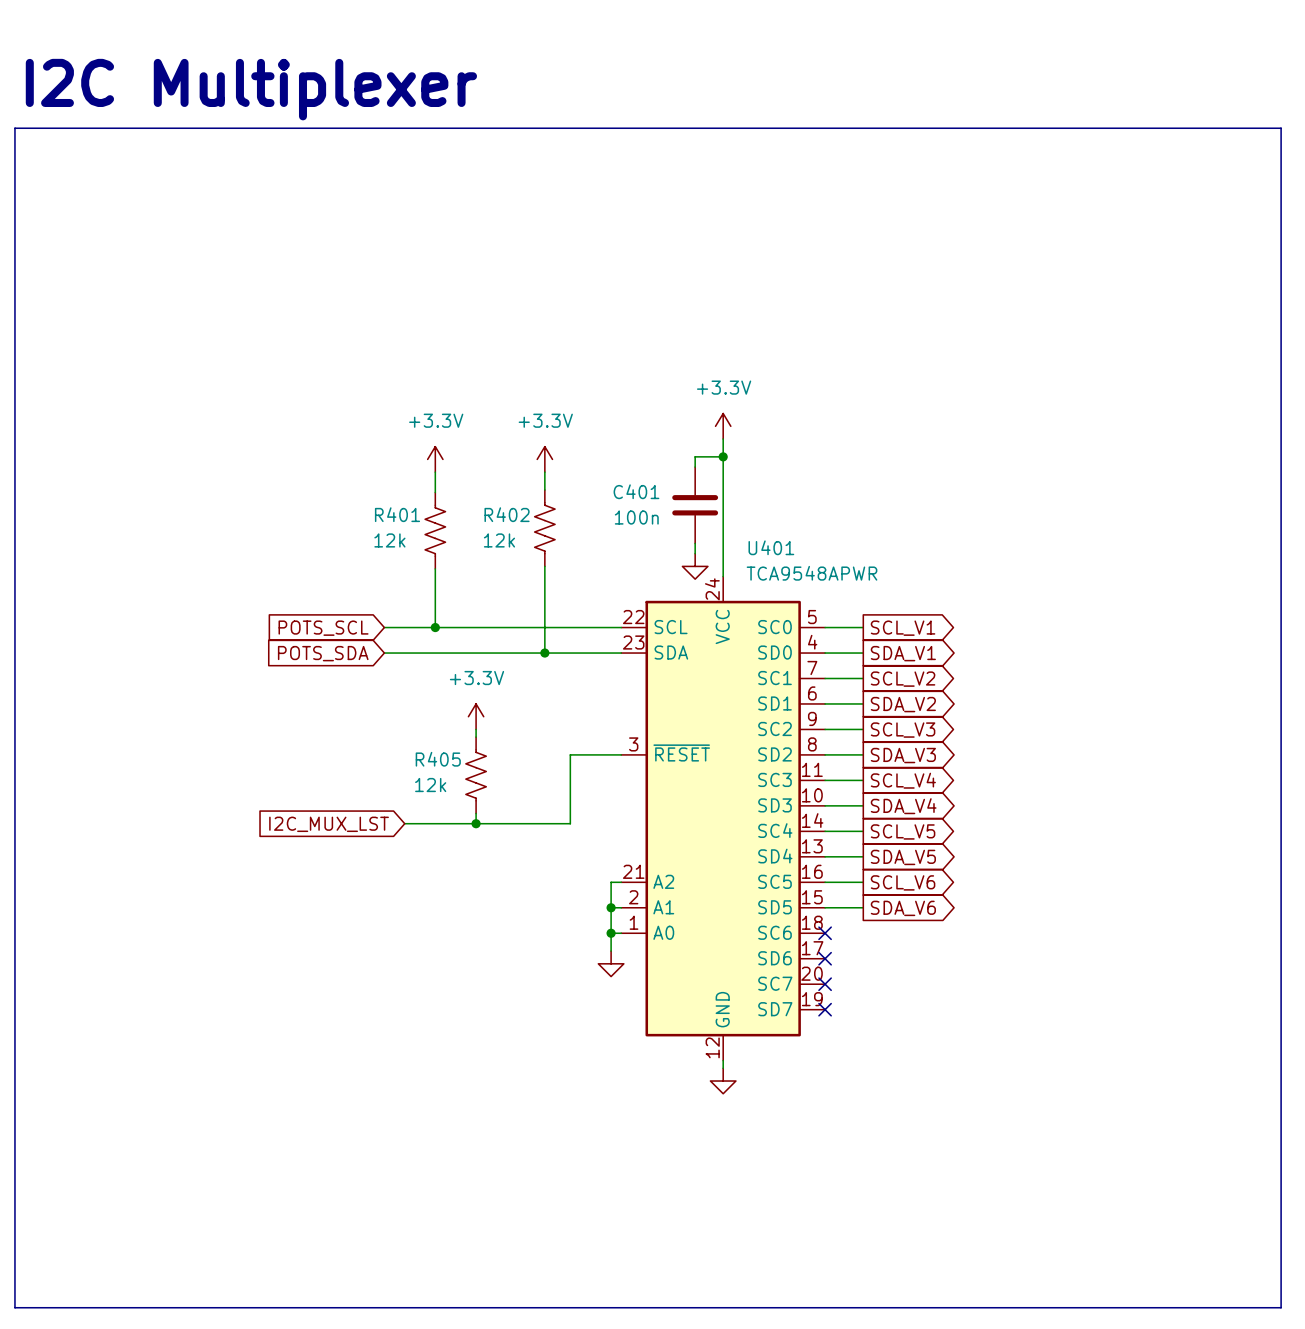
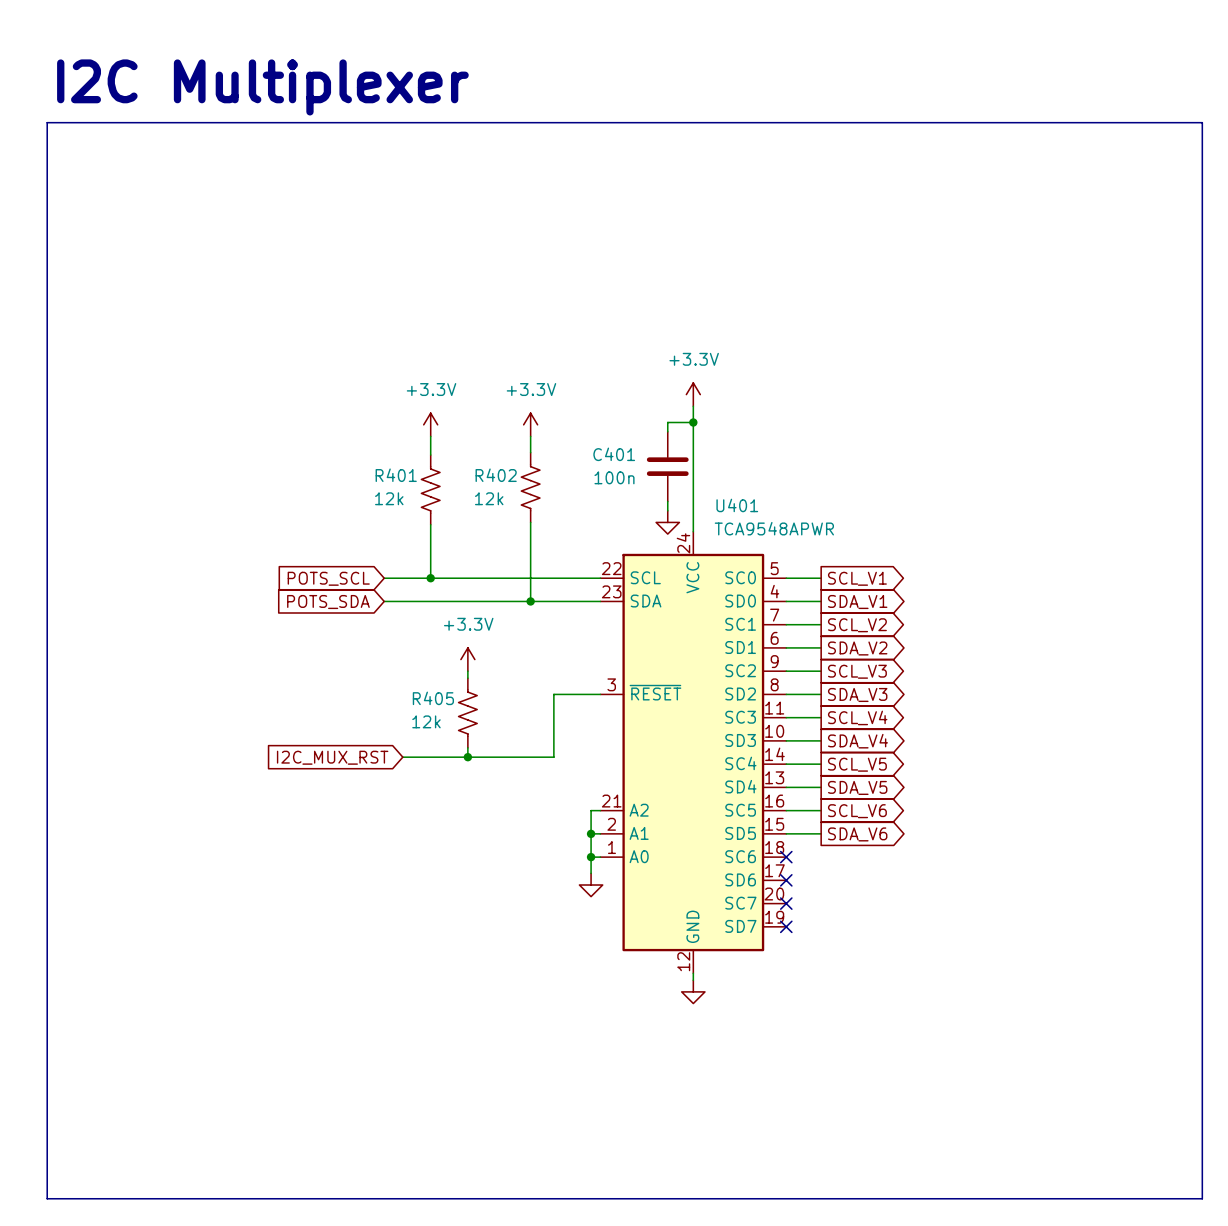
global label: I2C_MUX_LST (329, 824) -> I2C_MUX_RST (332, 757)

